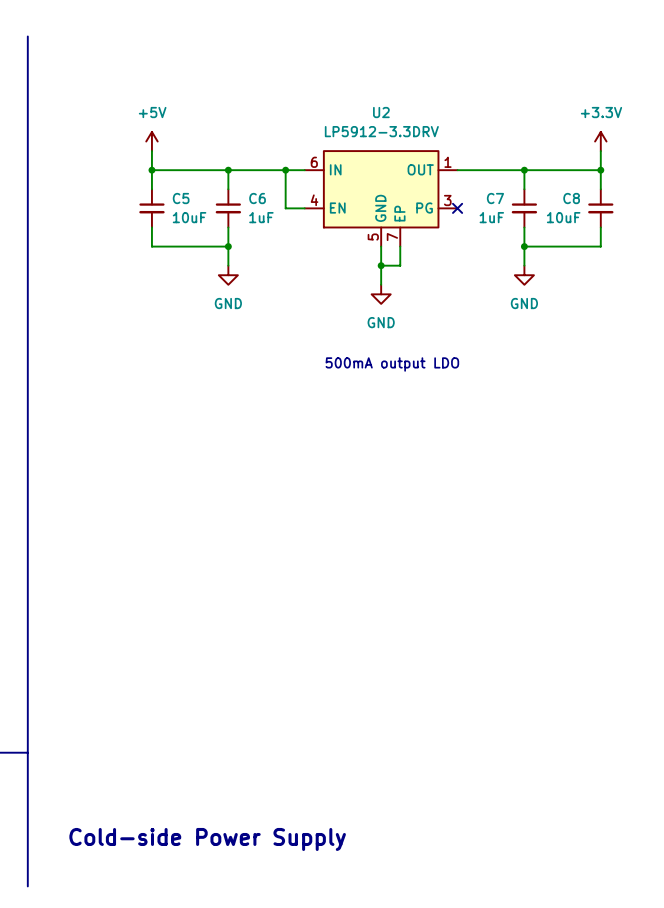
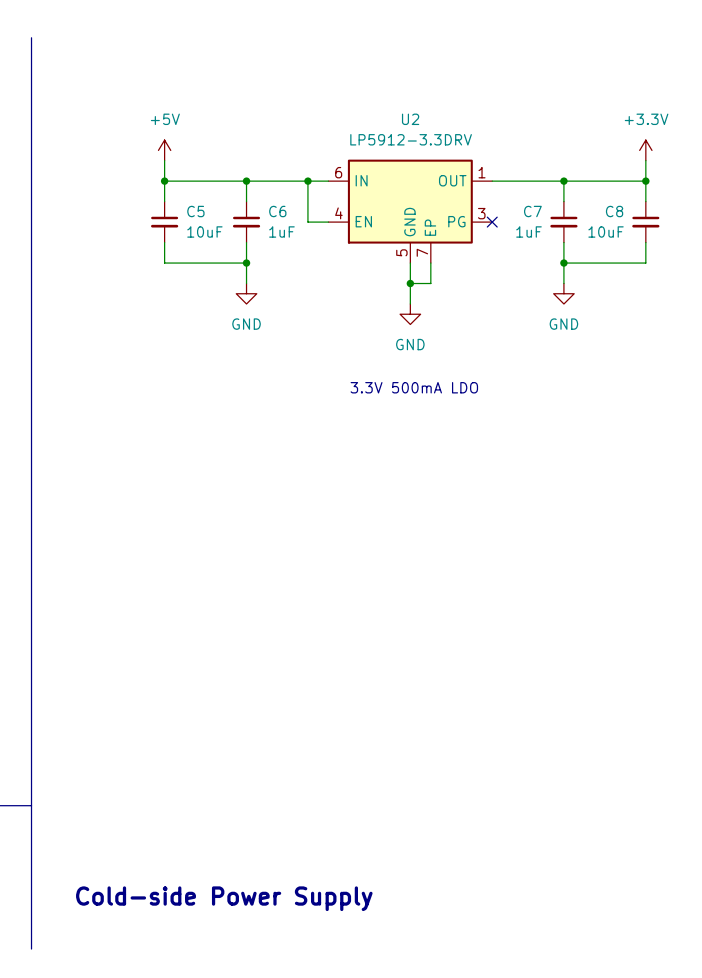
text: 500mA output LDO (392, 364) -> 3.3V 500mA LDO (414, 387)

